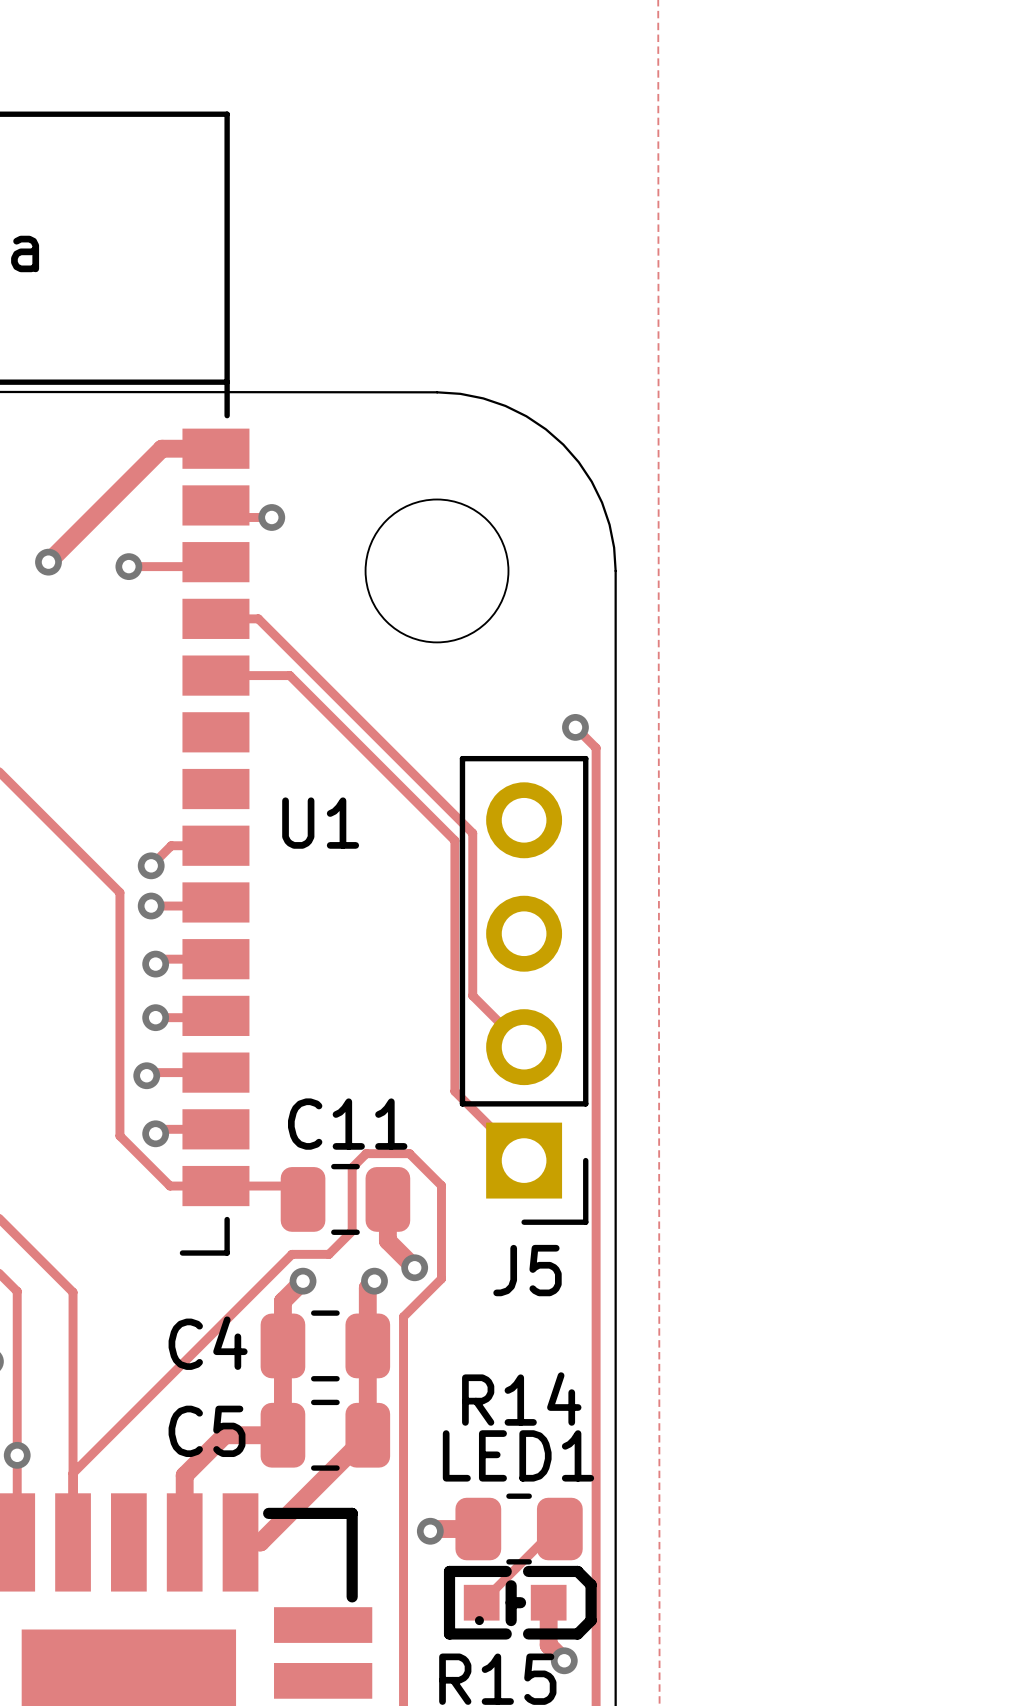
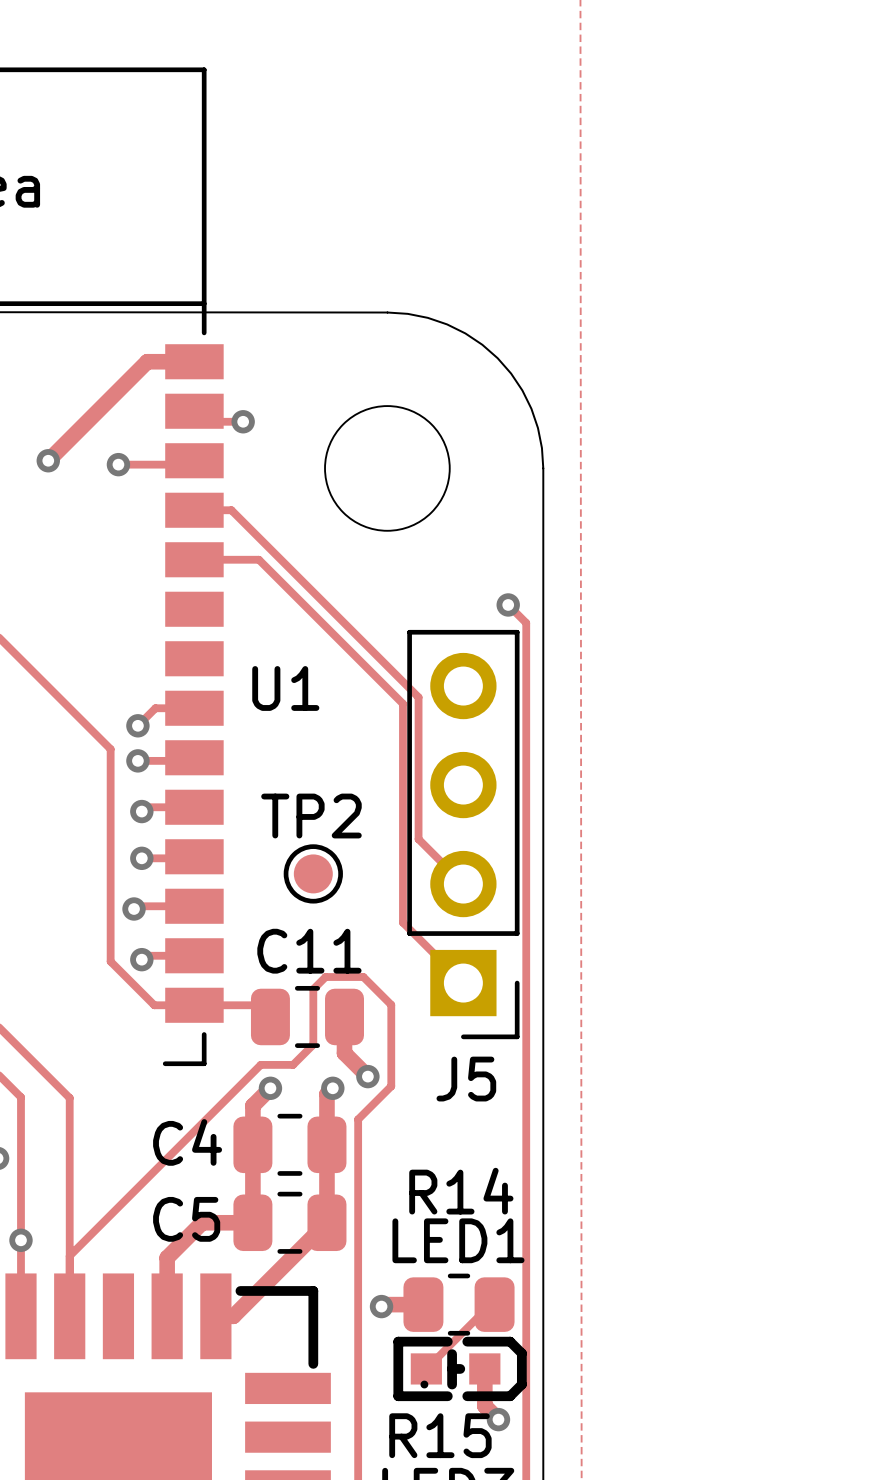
TP2: none -> (313, 873)

